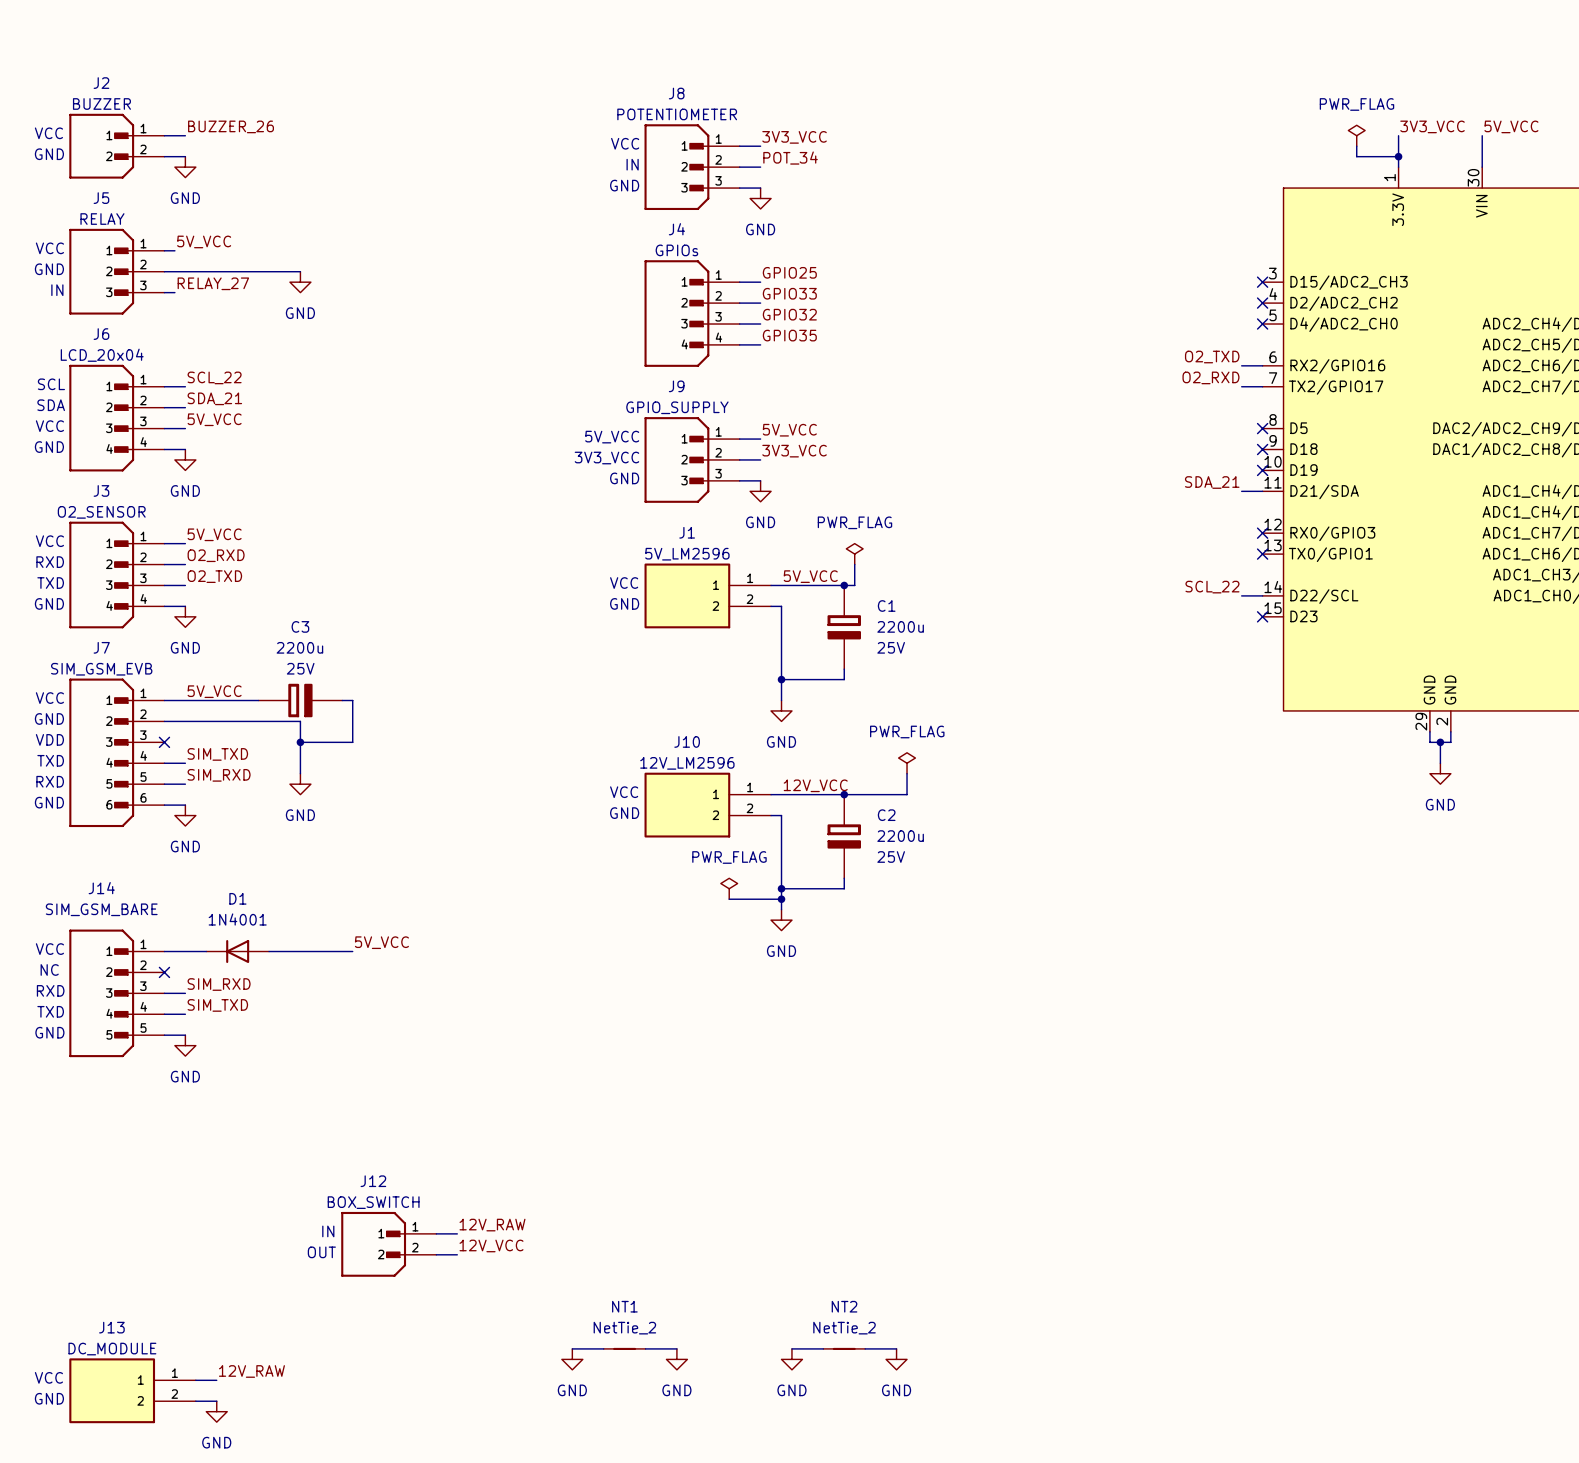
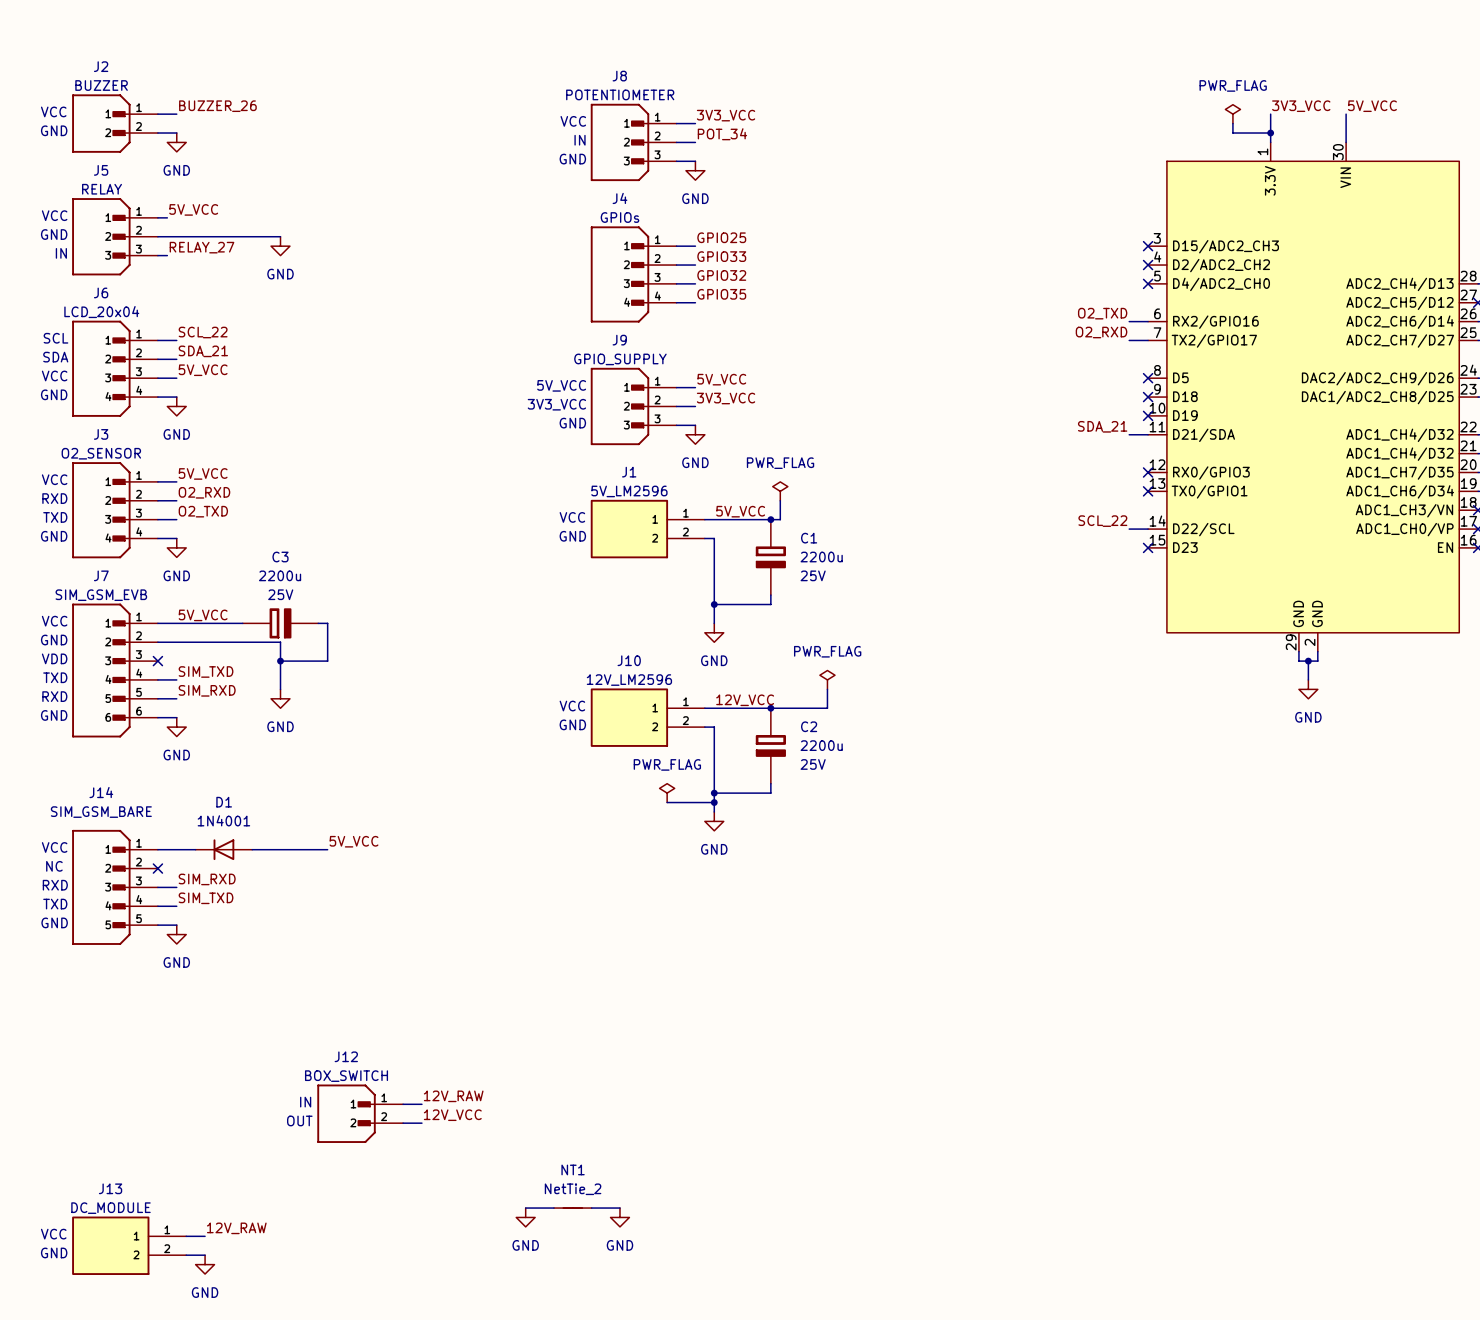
wire: (791, 1348) (823, 1348) -> none
NT2: NetTie_2 (844, 1348) -> none
wire: (865, 1348) (896, 1348) -> none
power symbol: GND (791, 1359) -> none
power symbol: GND (896, 1359) -> none

